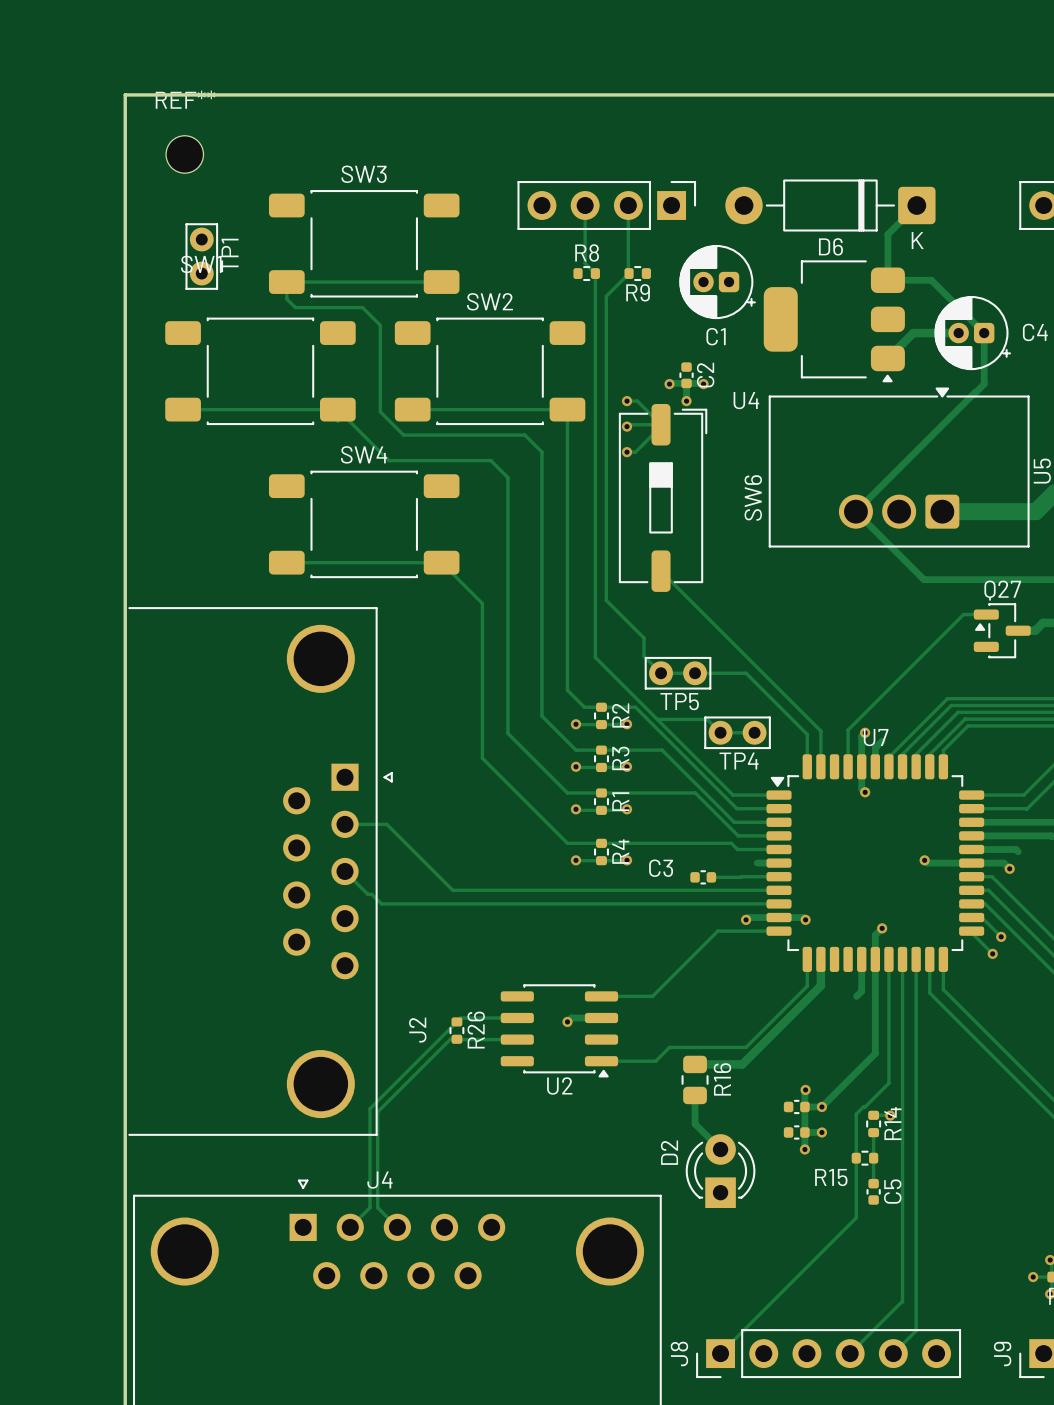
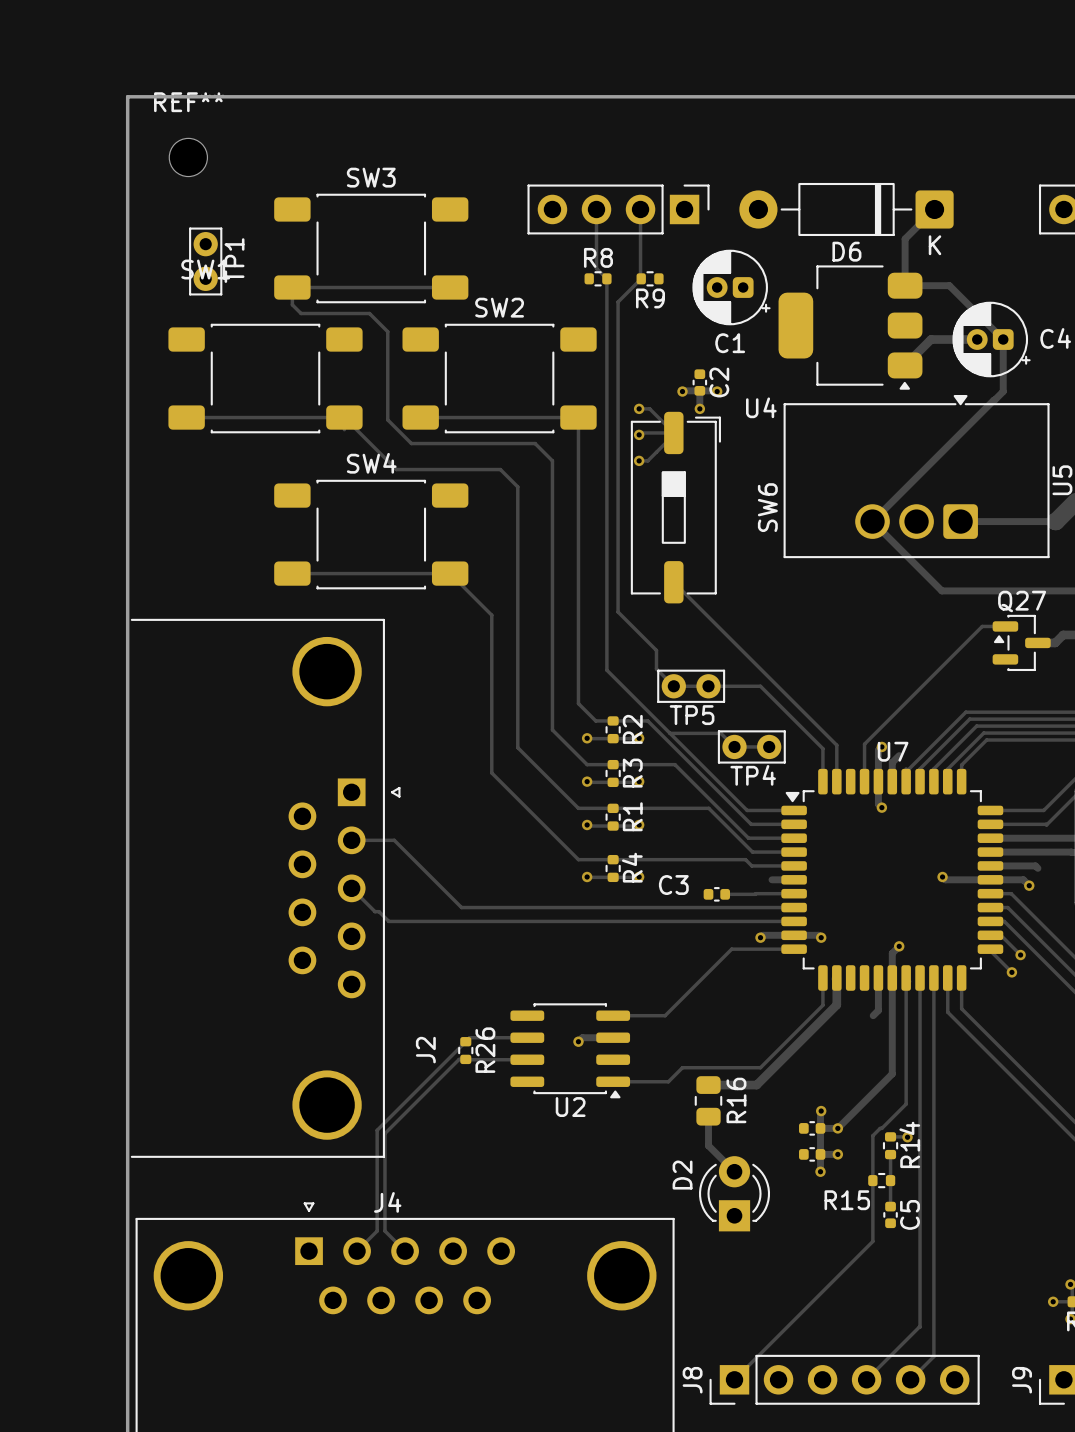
track width: thick (942, 511) (1035, 511) -> thin (960, 521) (1055, 521)

